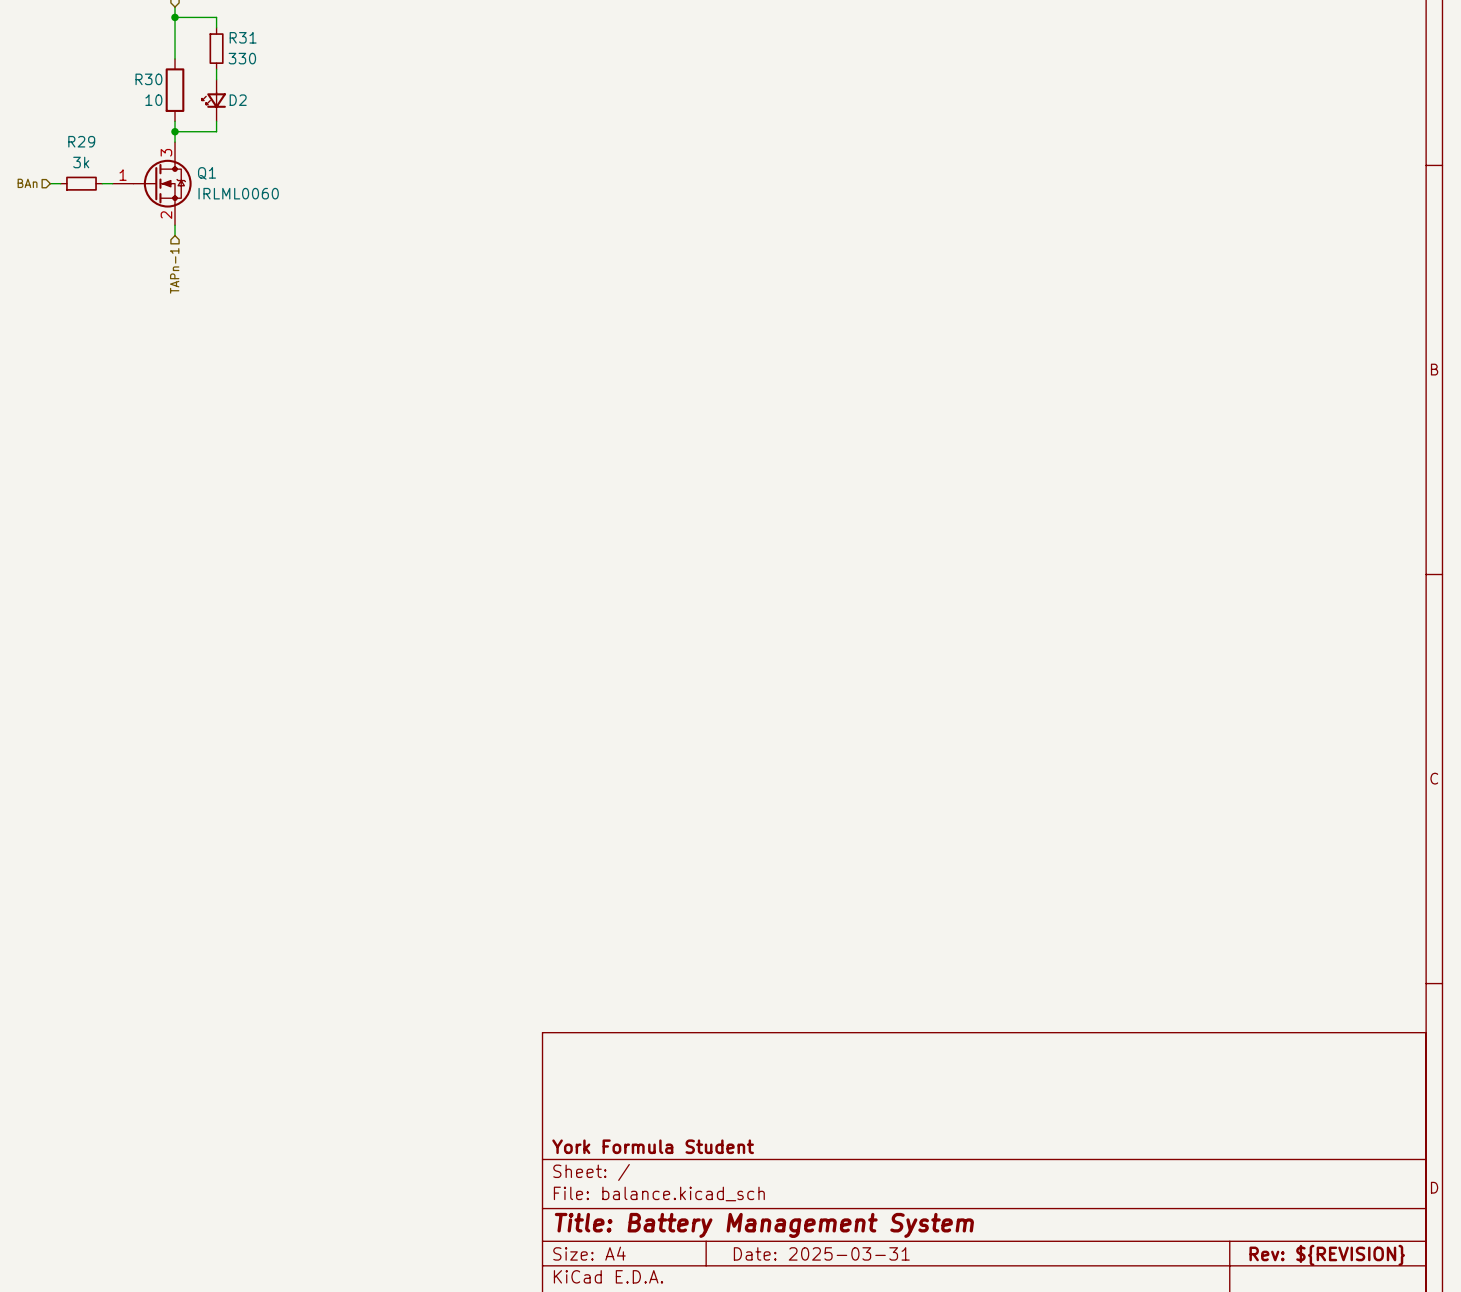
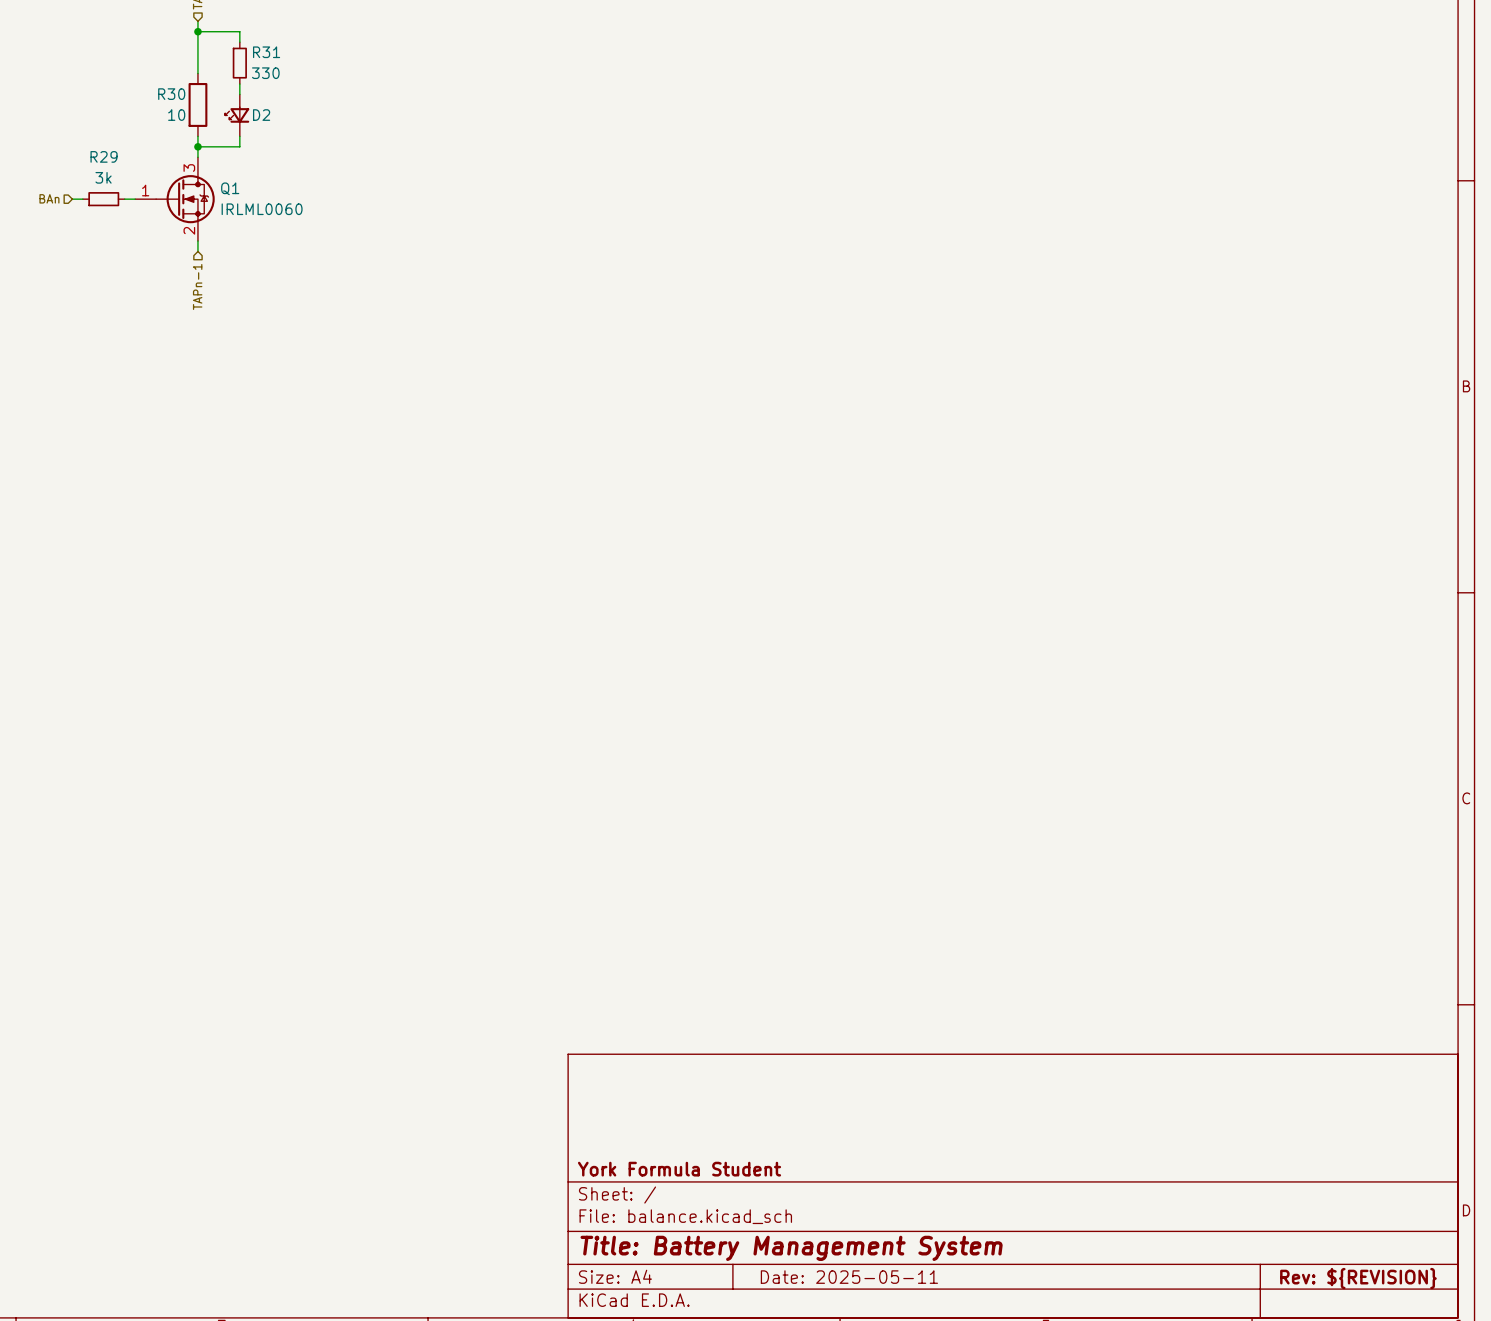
title block: Date: 2025-03-31 (821, 1253) -> Date: 2025-05-11 (849, 1277)

